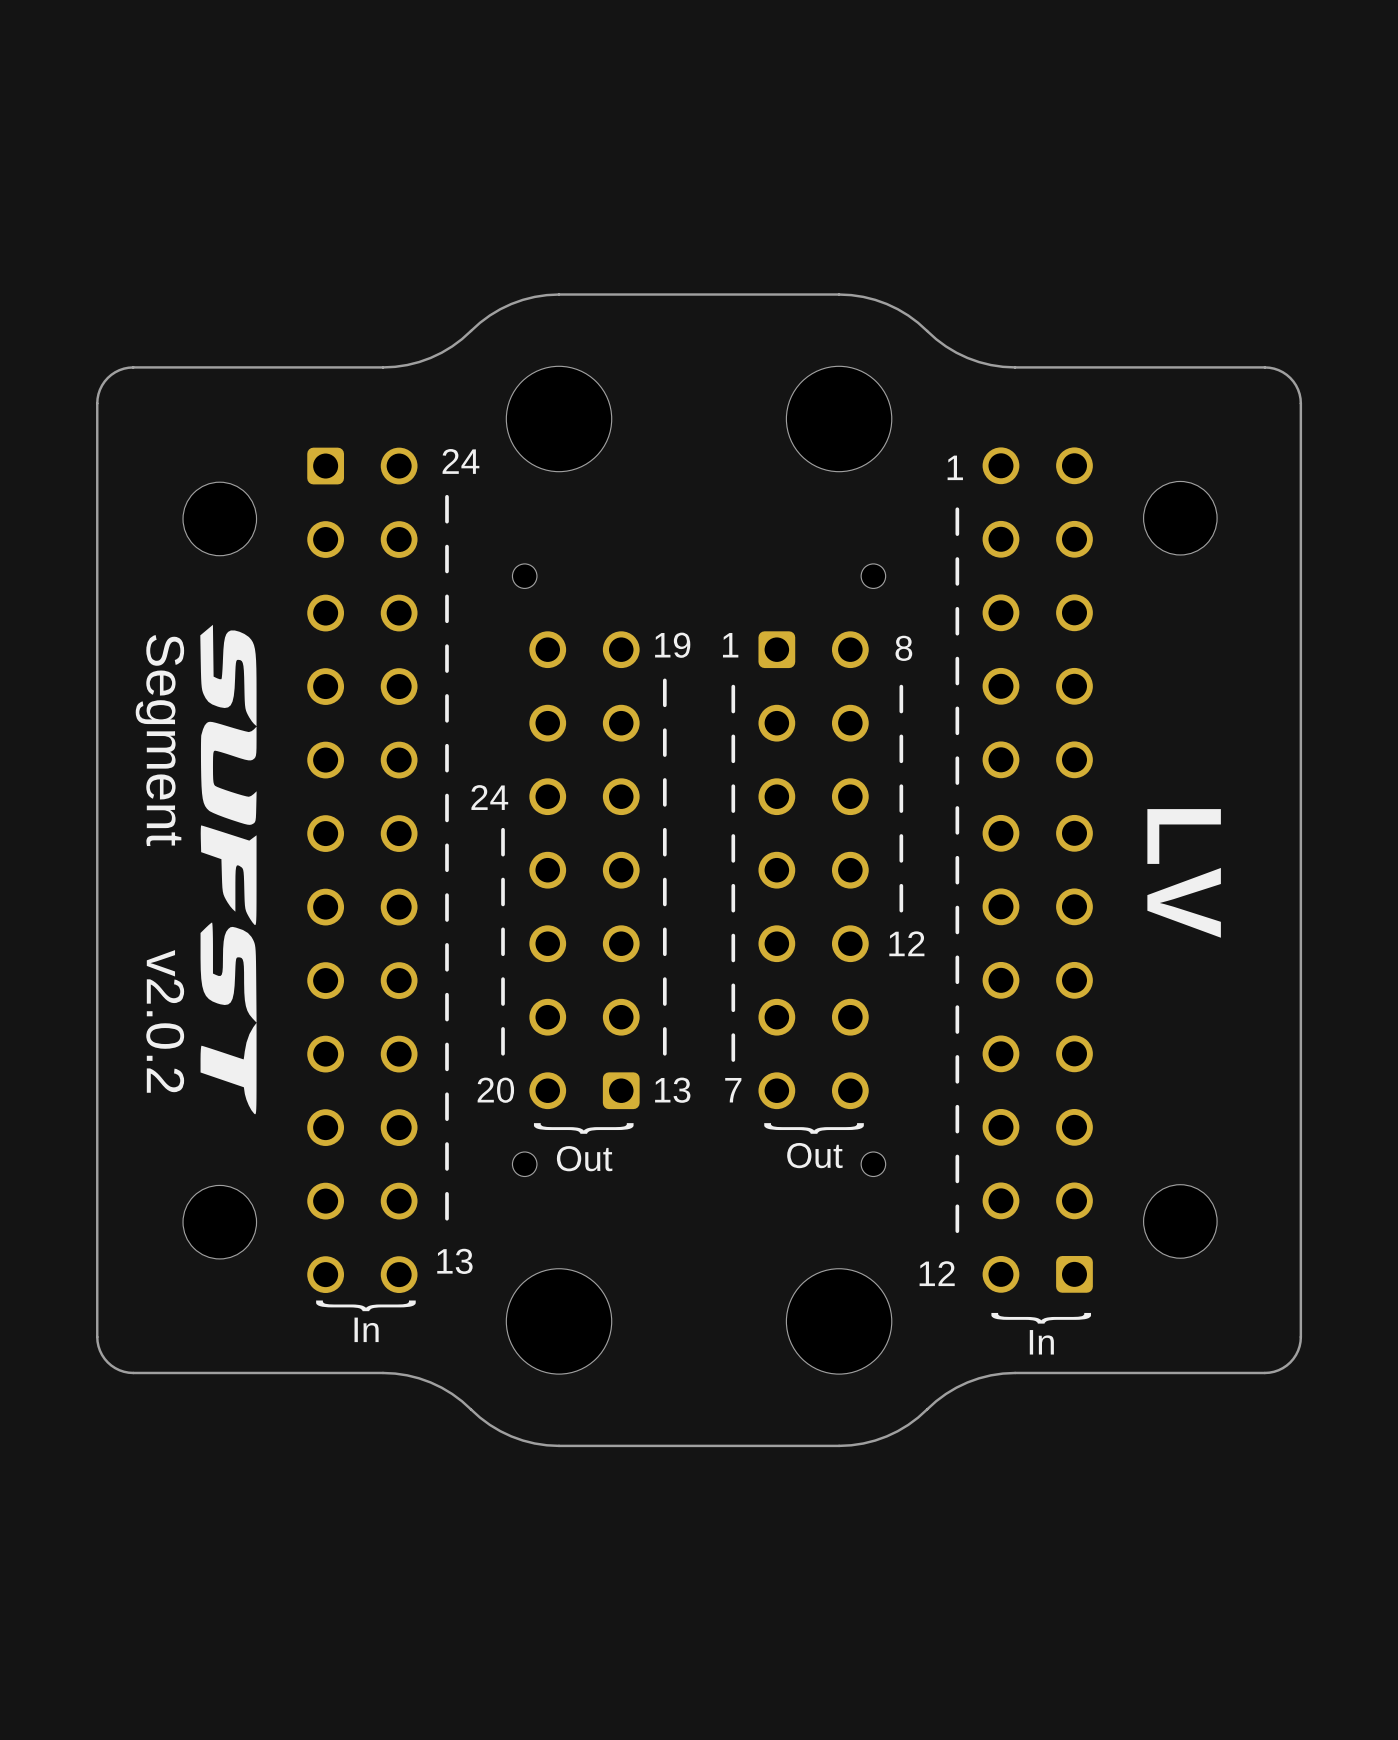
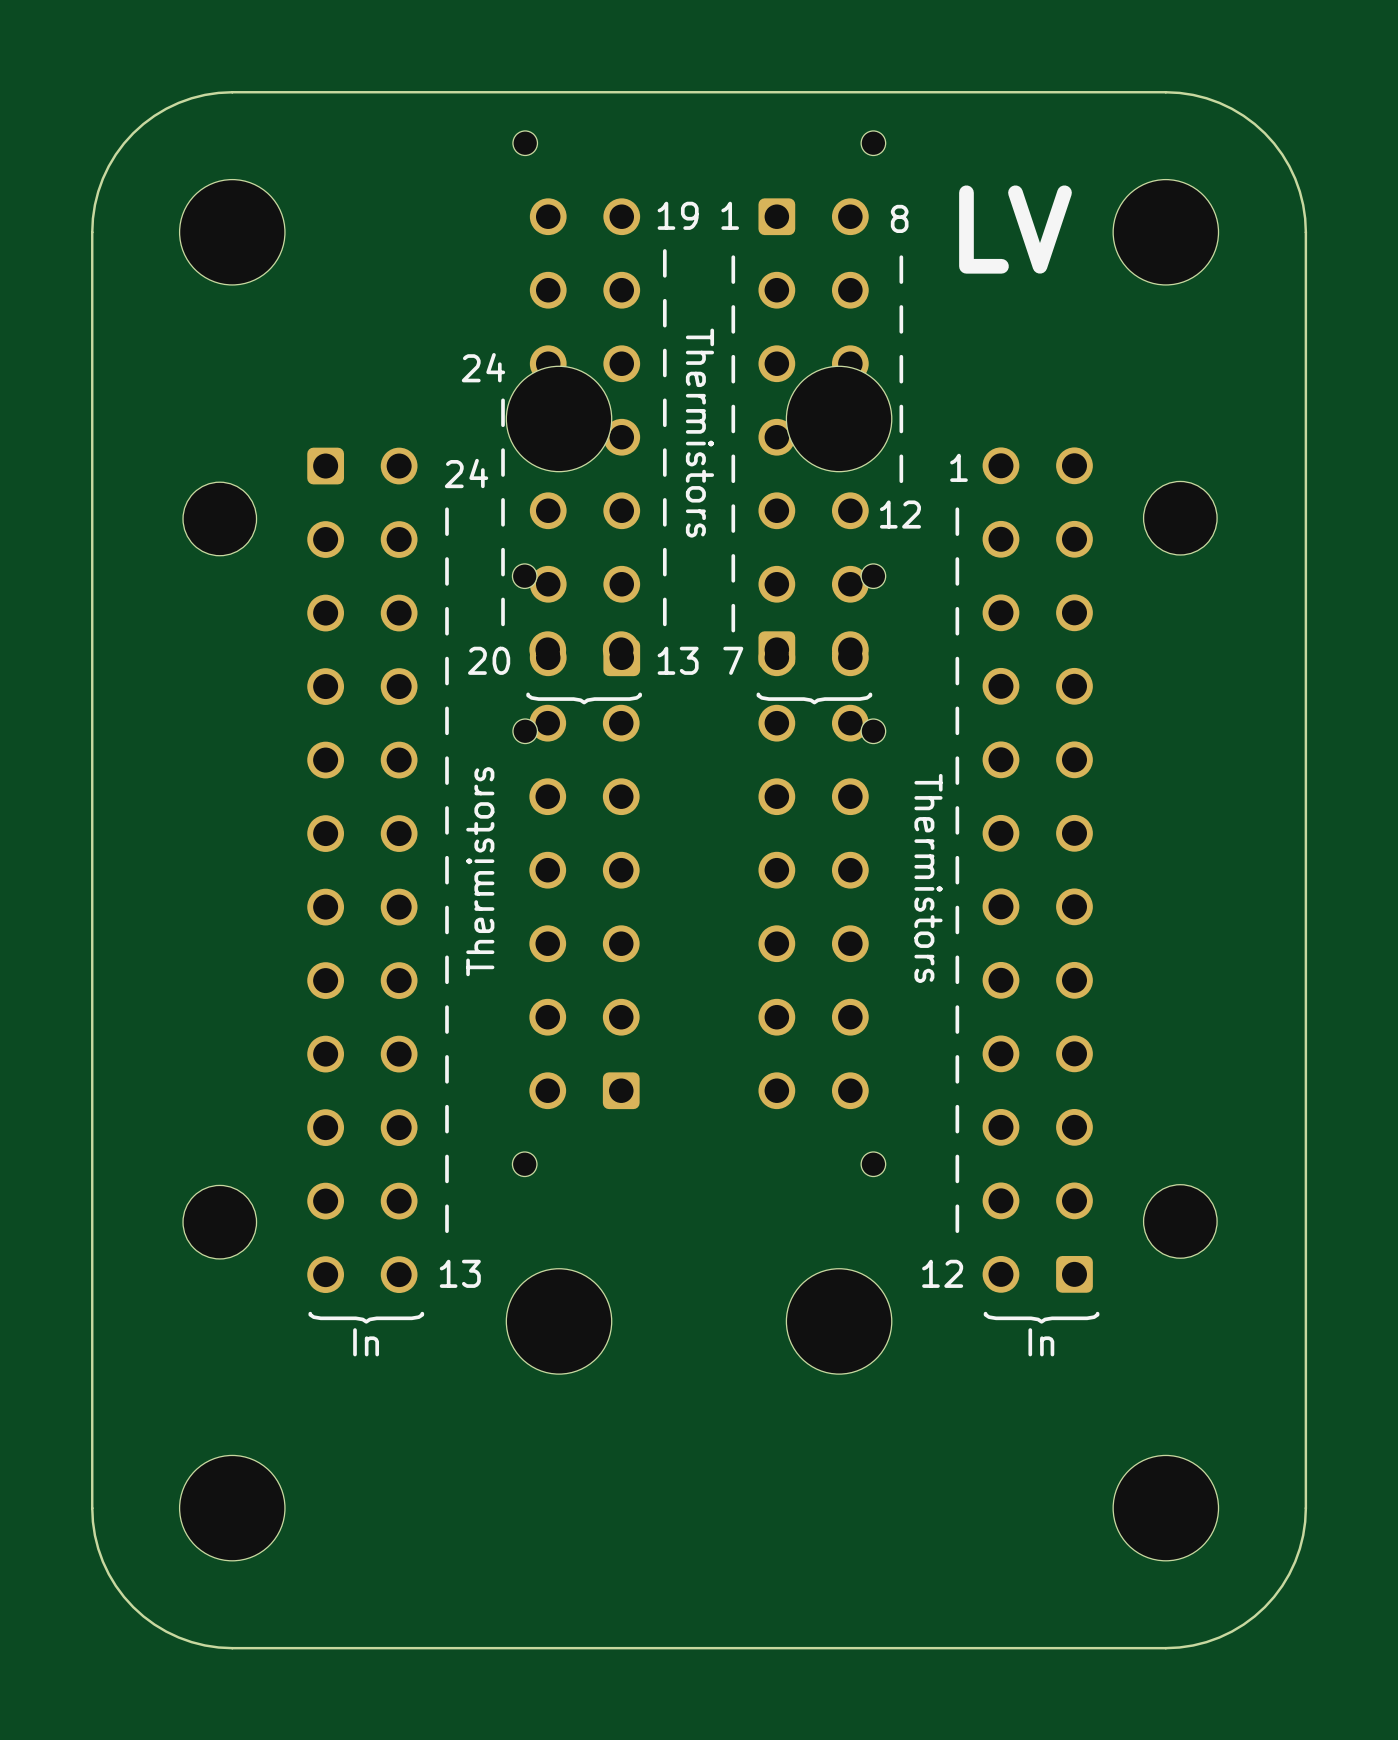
text: none -> LV (1015, 229)
part: none -> (232, 232)
part: none -> (1165, 232)
board edge: (839, 294) (546, 295) (522, 299) (500, 309) (480, 322) (452, 346) (430, 357) (407, 365) (382, 367) (133, 367) (115, 372) (104, 381) (98, 394) (97, 403) (97, 1336) (100, 1350) (111, 1365) (123, 1371) (133, 1372) (382, 1372) (407, 1375) (430, 1382) (452, 1393) (480, 1417) (500, 1431) (522, 1440) (546, 1445) (839, 1445) (863, 1443) (886, 1436) (908, 1424) (936, 1401) (956, 1387) (990, 1375) (1015, 1372) (1264, 1372) (1278, 1370) (1293, 1358) (1298, 1350) (1300, 1336) (1300, 403) (1298, 389) (1286, 374) (1269, 367) (1015, 367) (990, 365) (956, 352) (936, 339) (908, 315) (886, 303) (863, 296) (839, 294) -> (1165, 92) (1193, 94) (1219, 102) (1243, 115) (1264, 133) (1282, 154) (1295, 178) (1305, 218) (1305, 1508) (1299, 1548) (1282, 1585) (1254, 1616) (1231, 1631) (1206, 1642) (1165, 1648) (232, 1648) (191, 1642) (154, 1624) (124, 1596) (108, 1574) (98, 1548) (92, 1508) (92, 232) (98, 191) (115, 154) (143, 124) (166, 108) (191, 98) (218, 92) (1165, 92)
text: none -> Thermistors (699, 433)
part: none -> (576, 437)
part: none -> (822, 437)
text position: 24 (460, 461) -> 24 (466, 473)
line: (446, 496) (446, 509) -> (446, 521) (446, 534)
line: (446, 546) (446, 559) -> (446, 571) (446, 583)
line: (446, 596) (446, 608) -> (446, 621) (446, 633)
drawing: [200, 624, 257, 1115] -> none
text position: 19 (672, 645) -> 19 (678, 215)
text position: 1 (730, 645) -> 1 (730, 215)
line: (446, 646) (446, 658) -> (446, 671) (446, 683)
text position: 8 (903, 648) -> 8 (899, 218)
line: (664, 680) (664, 705) -> (664, 250) (664, 275)
line: (733, 686) (733, 711) -> (733, 257) (733, 282)
line: (901, 686) (901, 711) -> (901, 257) (901, 282)
line: (446, 695) (446, 708) -> (446, 720) (446, 733)
text: none -> } (584, 698)
text: none -> } (814, 698)
line: (664, 730) (664, 755) -> (664, 300) (664, 325)
line: (733, 736) (733, 761) -> (733, 306) (733, 331)
line: (901, 736) (901, 761) -> (901, 306) (901, 331)
text: Segment (159, 740) -> none
line: (446, 745) (446, 758) -> (446, 770) (446, 783)
line: (664, 779) (664, 804) -> (664, 350) (664, 375)
line: (733, 786) (733, 811) -> (733, 356) (733, 381)
line: (901, 786) (901, 811) -> (901, 356) (901, 381)
line: (446, 795) (446, 807) -> (446, 820) (446, 832)
text position: 24 (489, 797) -> 24 (483, 367)
line: (503, 829) (503, 854) -> (503, 400) (503, 425)
line: (664, 829) (664, 854) -> (664, 400) (664, 425)
line: (733, 835) (733, 860) -> (733, 406) (733, 431)
line: (901, 835) (901, 860) -> (901, 406) (901, 431)
line: (446, 845) (446, 857) -> (446, 870) (446, 882)
text: none -> Thermistors (928, 878)
text: LV (1184, 873) -> none
line: (503, 879) (503, 904) -> (503, 450) (503, 475)
line: (664, 879) (664, 904) -> (664, 450) (664, 475)
text: none -> Thermistors (480, 871)
line: (733, 885) (733, 910) -> (733, 456) (733, 481)
line: (901, 885) (901, 910) -> (901, 456) (901, 481)
line: (446, 895) (446, 907) -> (446, 919) (446, 932)
line: (503, 929) (503, 954) -> (503, 499) (503, 524)
line: (664, 929) (664, 954) -> (664, 499) (664, 524)
line: (733, 935) (733, 960) -> (733, 506) (733, 531)
text position: 12 (906, 943) -> 12 (900, 514)
line: (446, 944) (446, 957) -> (446, 969) (446, 982)
line: (503, 979) (503, 1004) -> (503, 549) (503, 574)
line: (664, 979) (664, 1004) -> (664, 549) (664, 574)
line: (733, 985) (733, 1010) -> (733, 555) (733, 580)
line: (446, 994) (446, 1007) -> (446, 1019) (446, 1032)
text: v2.0.2 (165, 1021) -> none
line: (503, 1028) (503, 1053) -> (503, 599) (503, 624)
line: (664, 1028) (664, 1053) -> (664, 599) (664, 624)
line: (733, 1035) (733, 1060) -> (733, 605) (733, 630)
line: (446, 1044) (446, 1056) -> (446, 1069) (446, 1081)
text position: 20 (495, 1090) -> 20 (489, 660)
text position: 13 (672, 1090) -> 13 (678, 660)
text position: 7 (733, 1090) -> 7 (733, 660)
line: (446, 1094) (446, 1106) -> (446, 1119) (446, 1131)
text: } (583, 1128) -> none
text: } (814, 1128) -> none
line: (446, 1144) (446, 1156) -> (446, 1168) (446, 1181)
text: Out (814, 1155) -> none
text: Out (584, 1158) -> none
line: (446, 1193) (446, 1206) -> (446, 1218) (446, 1231)
text position: 13 (454, 1261) -> 13 (460, 1273)
text position: } (365, 1305) -> } (366, 1317)
text position: In (366, 1329) -> In (366, 1342)
part: none -> (232, 1508)
part: none -> (1165, 1508)

